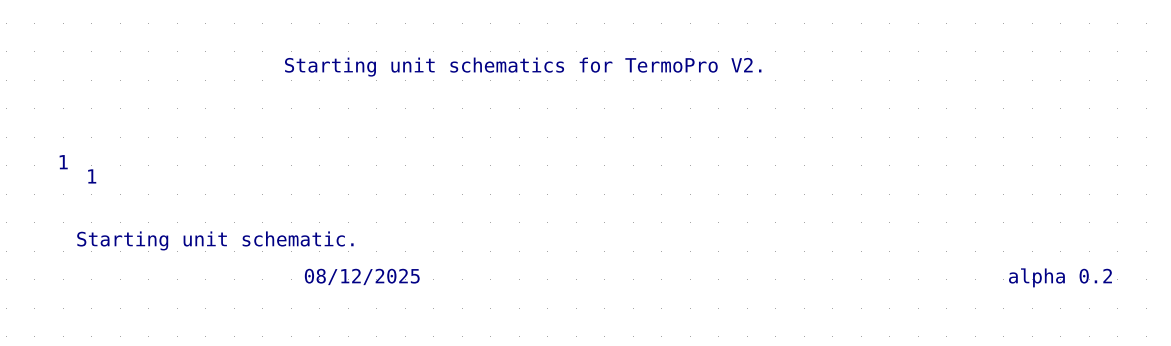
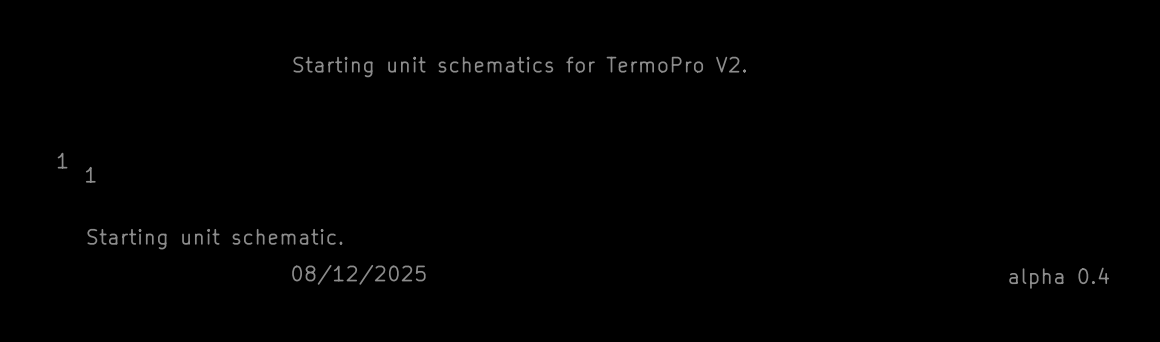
text: alpha 0.2 (1060, 277) -> alpha 0.4 (1059, 278)

